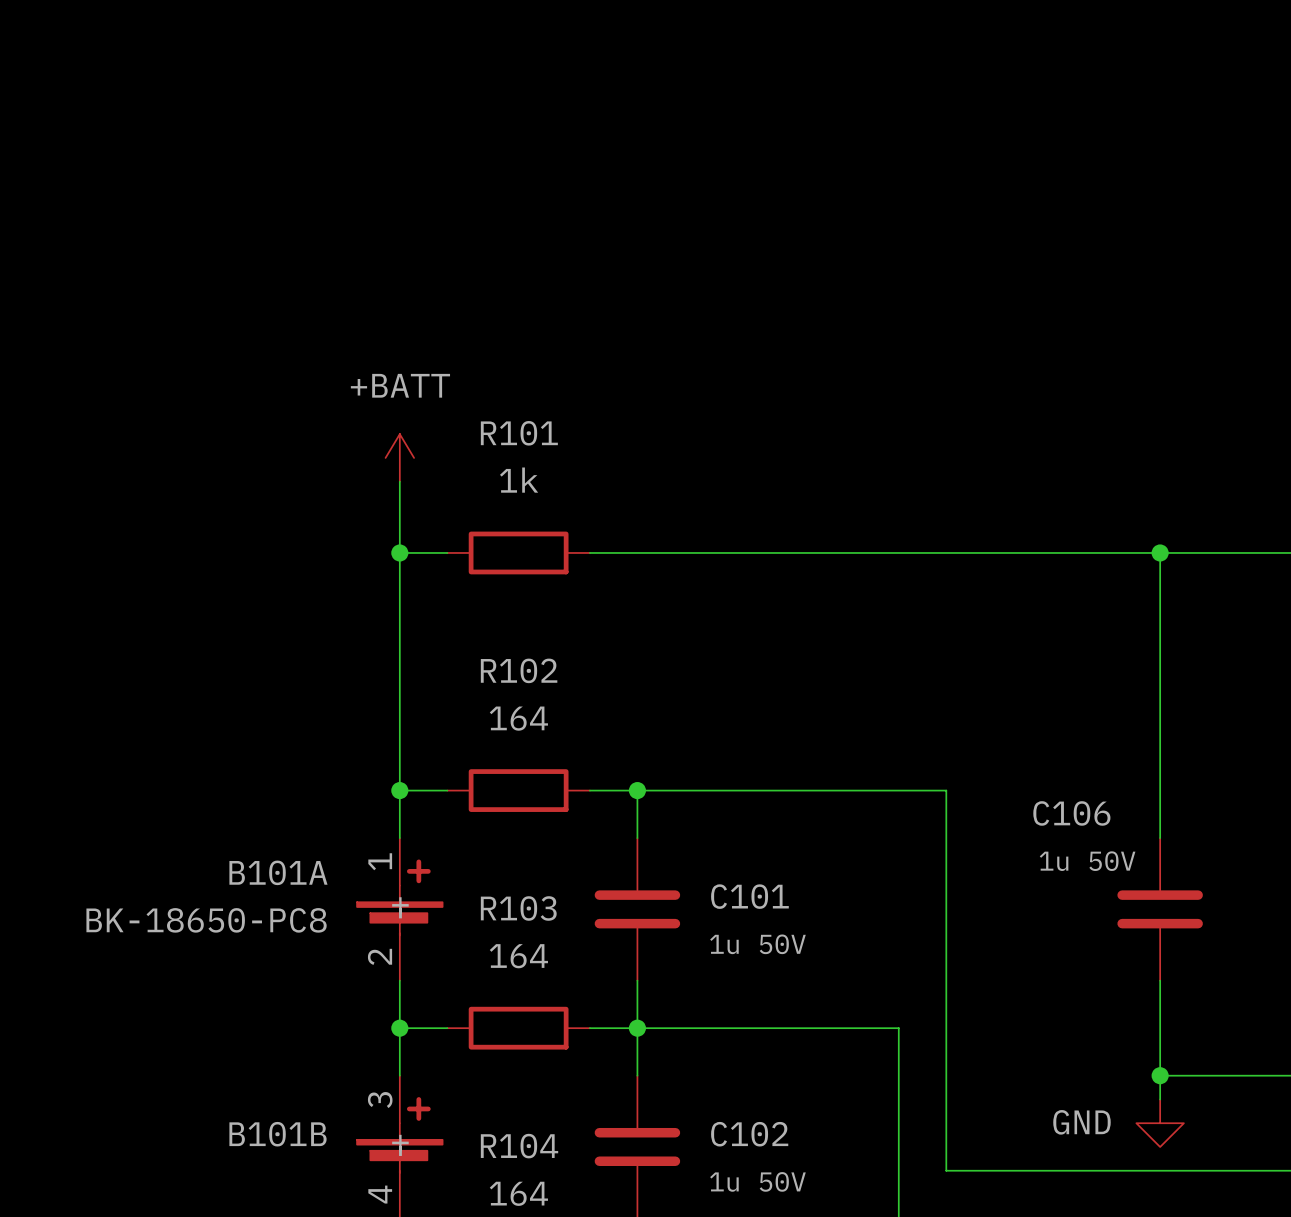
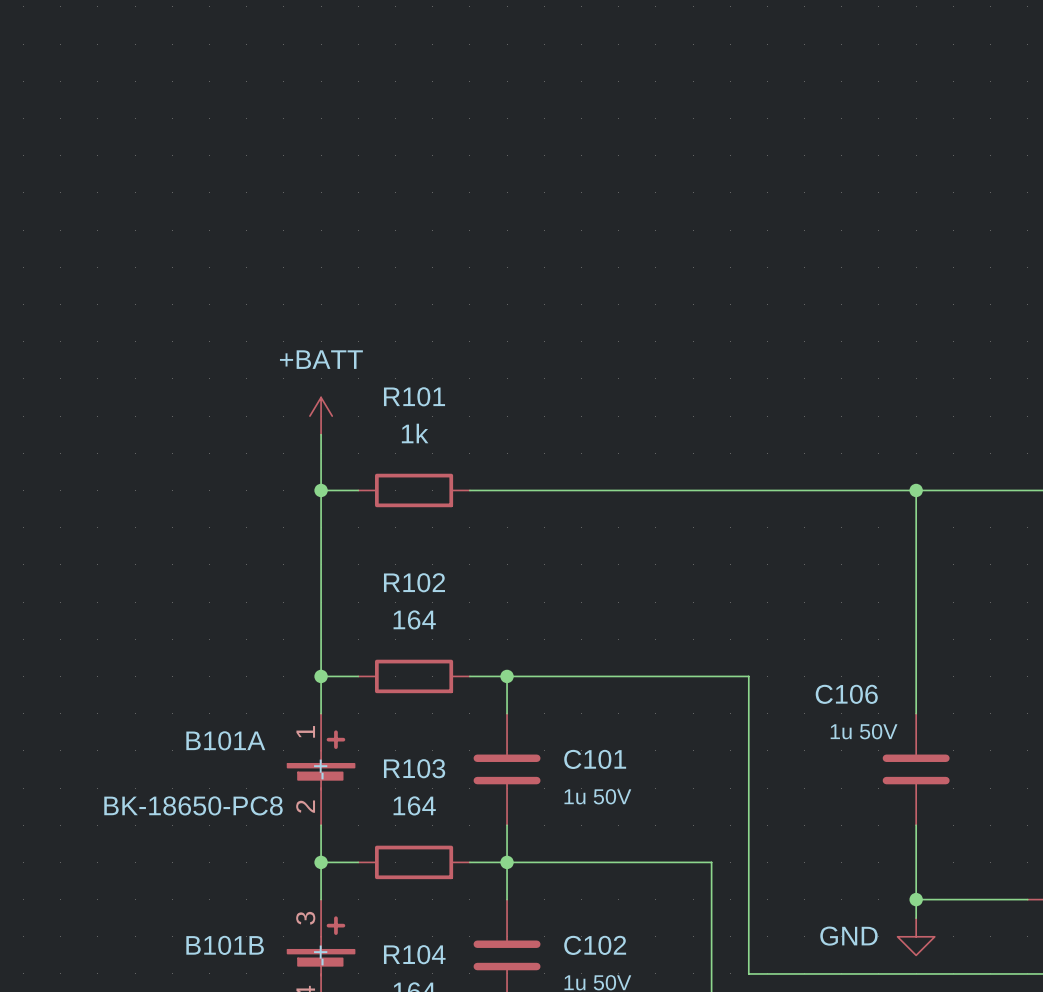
B101A value position: BK-18650-PC8 (206, 920) -> BK-18650-PC8 (193, 805)

